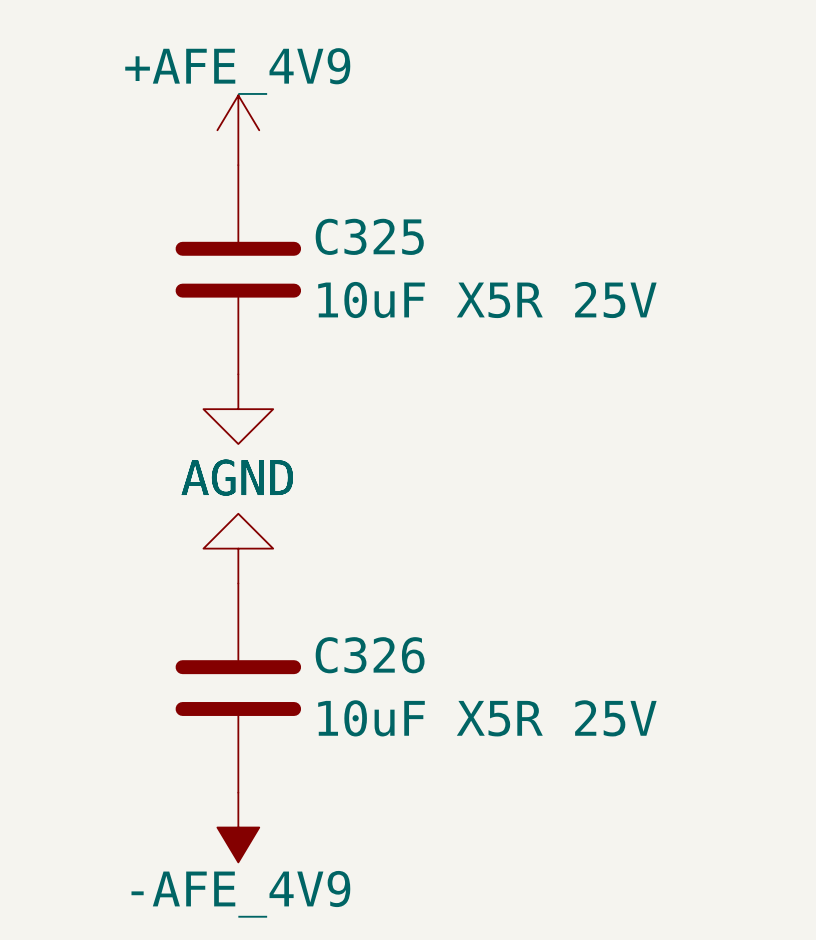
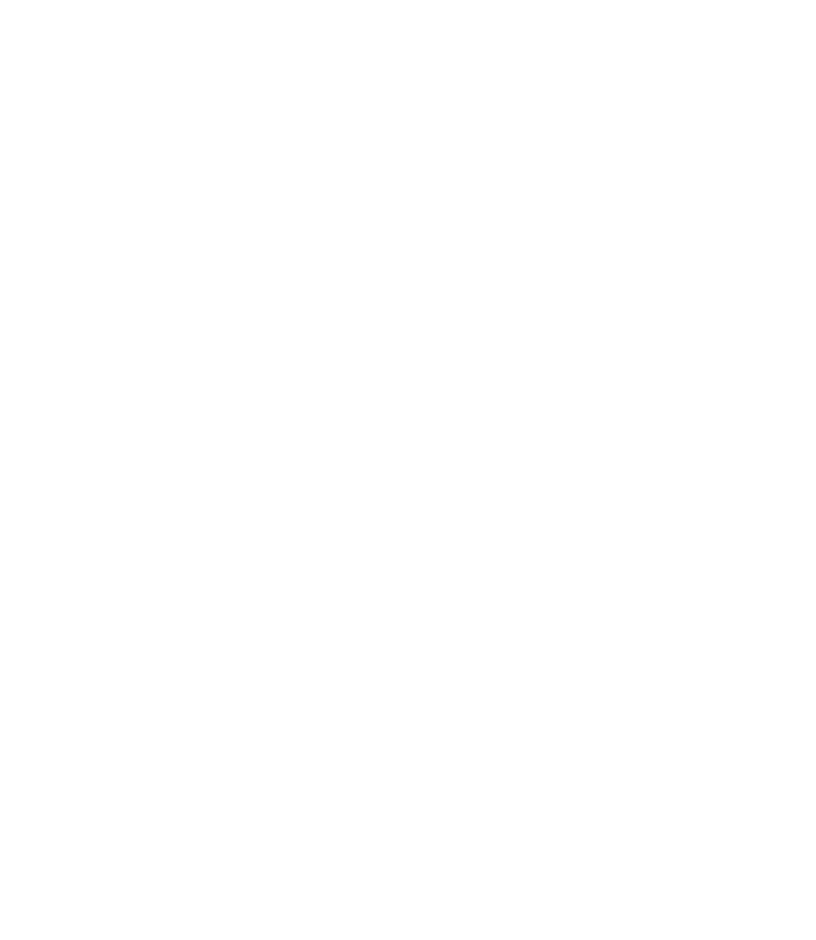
power symbol: +AFE_4V9 (238, 130) -> none
C325: 10uF X5R 25V (238, 269) -> none
power symbol: AGND (238, 409) -> none
power symbol: AGND (238, 548) -> none
C326: 10uF X5R 25V (238, 688) -> none
power symbol: -AFE_4V9 (238, 827) -> none

